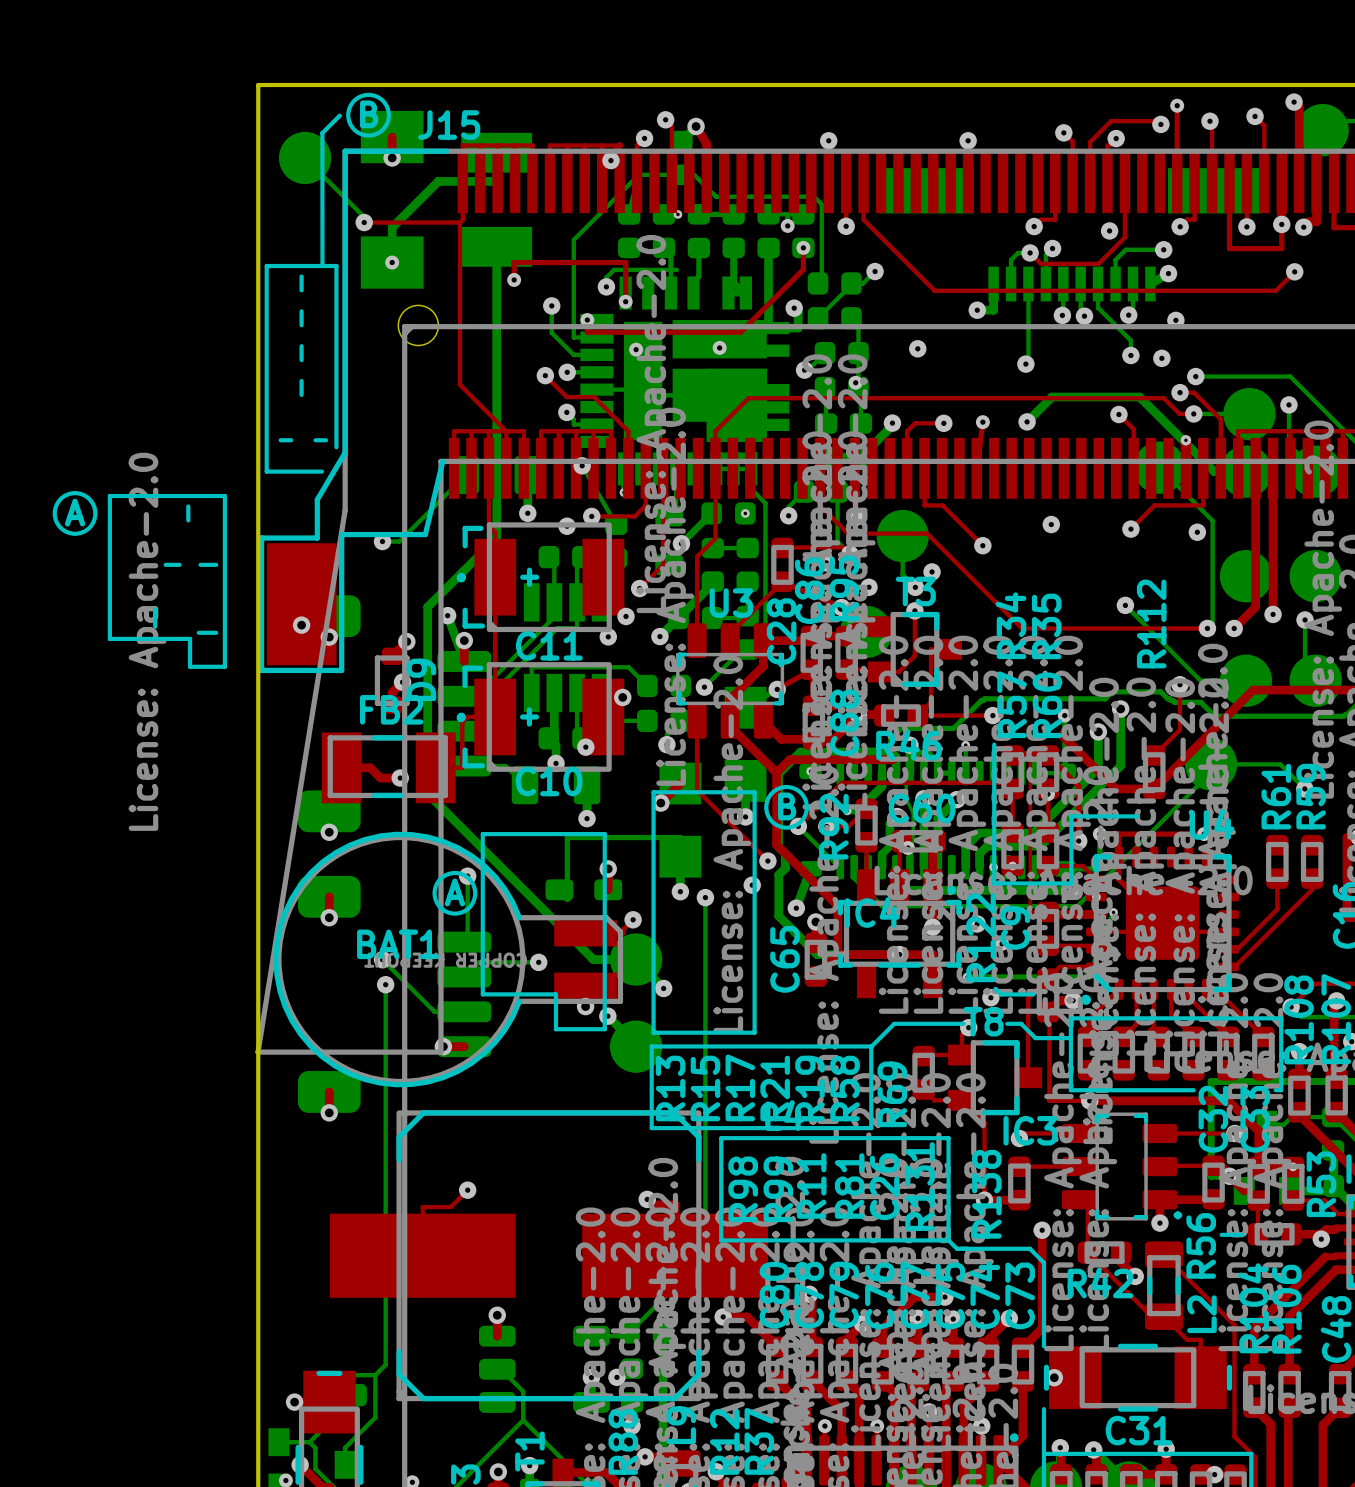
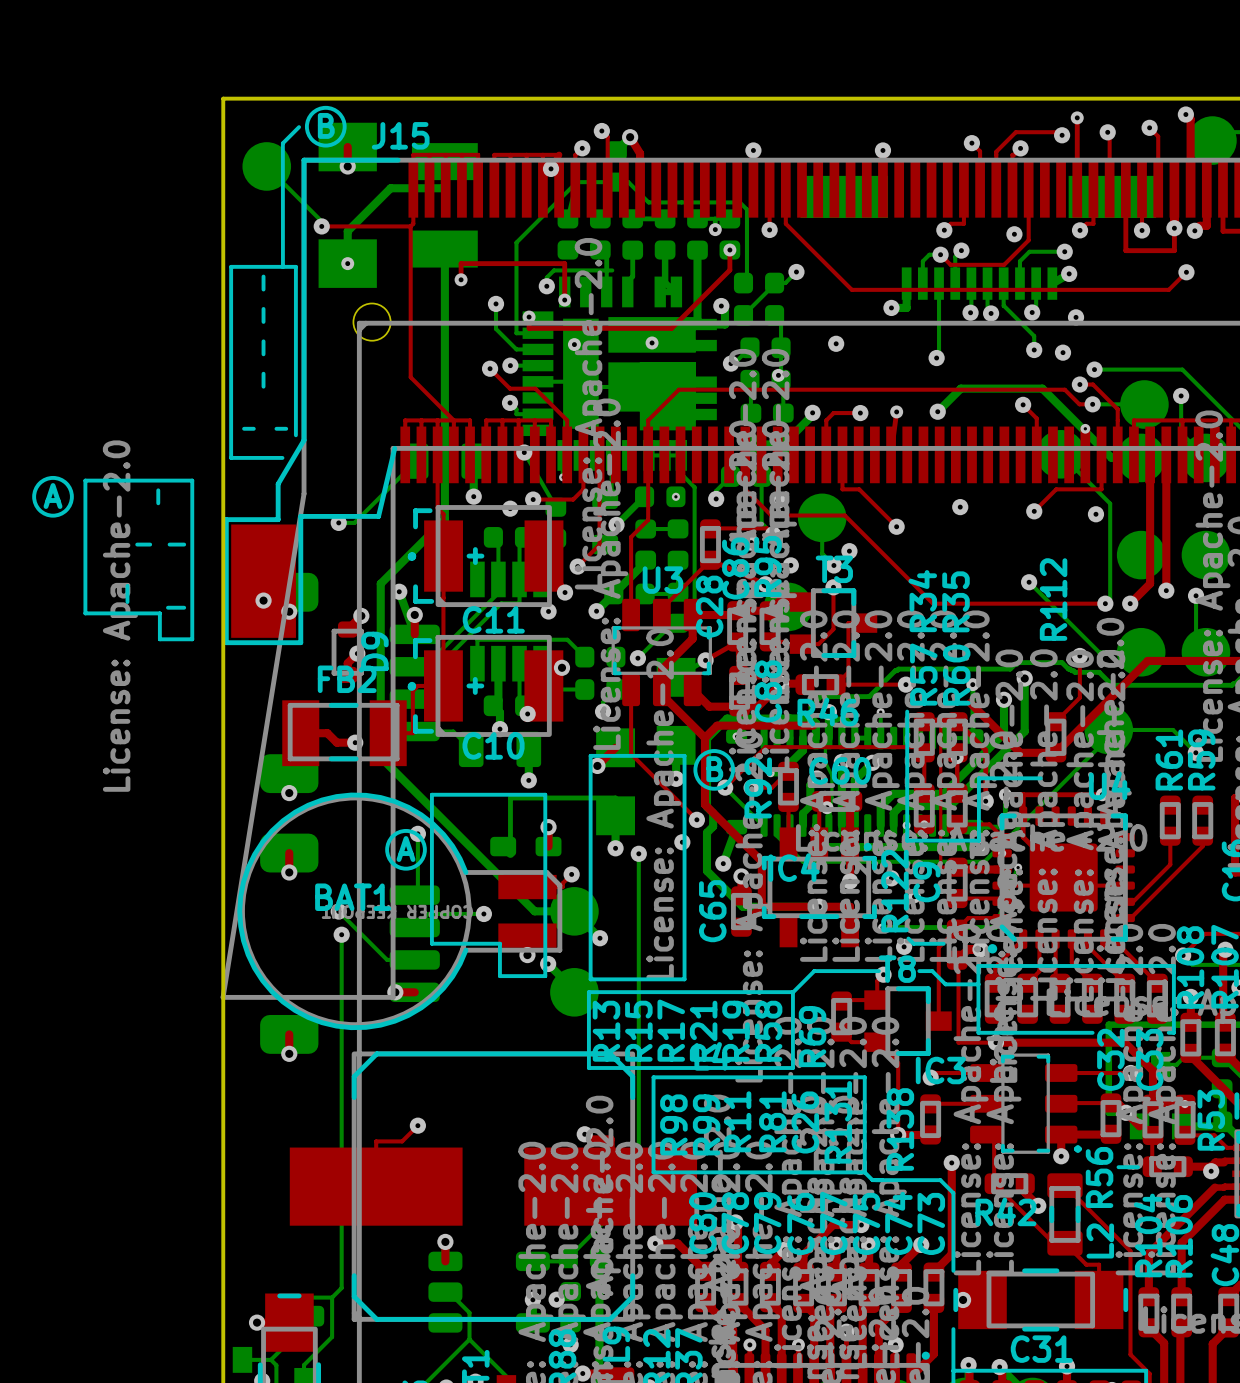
via: (677, 214) -> none

